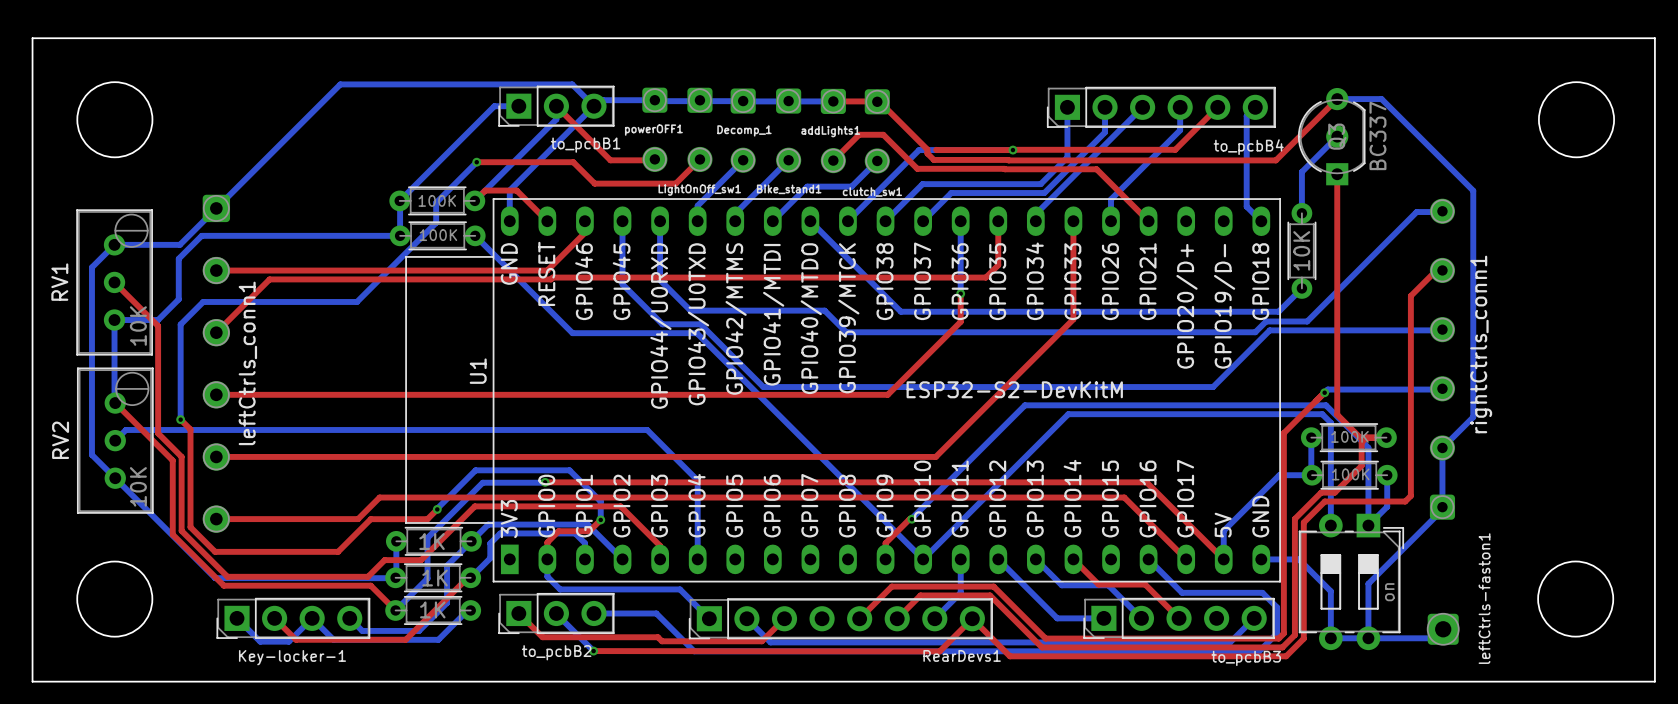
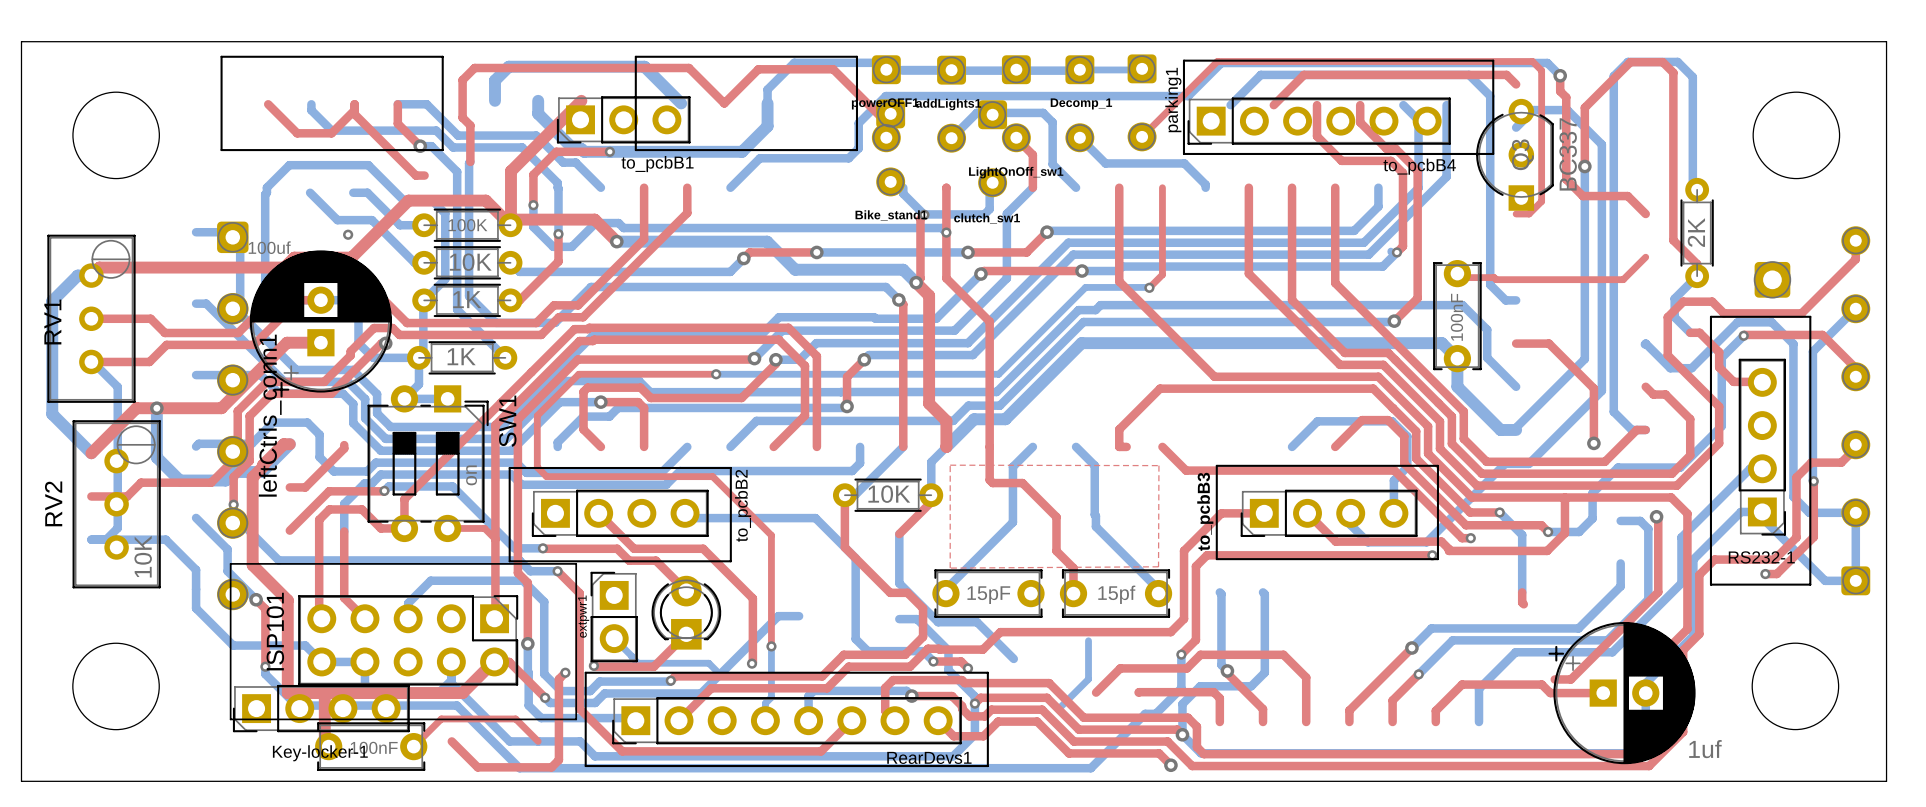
line: none -> (221, 56) (442, 56) (442, 150) (221, 150) (221, 56)
line: none -> (635, 56) (856, 56) (856, 150) (635, 150) (635, 56)
line: none -> (1183, 60) (1493, 60) (1493, 153) (1183, 153) (1183, 60)
bottom track: none -> (1142, 68) (1080, 69)
bottom track: none -> (1079, 69) (886, 70) (879, 62) (794, 62) (767, 89) (767, 126) (742, 151) (584, 151) (581, 148) (573, 148) (538, 113) (538, 100)
top track: none -> (1560, 75) (1560, 91) (1566, 97) (1566, 179) (1582, 196) (1627, 196) (1645, 214)
bottom track: none -> (1560, 75) (1547, 63) (1221, 63) (1188, 96) (885, 96) (858, 123) (858, 148) (848, 158) (759, 158) (730, 187)
via: none -> (1560, 75)
top track: none -> (1516, 84) (1506, 74) (1304, 74) (1273, 105)
bottom track: none -> (494, 100) (494, 80) (508, 66) (644, 66) (681, 103)
top track: none -> (581, 100) (510, 171) (510, 224)
parking1: none -> (1142, 102)
top track: none -> (268, 104) (297, 133) (331, 133) (354, 110)
bottom track: none -> (311, 104) (311, 110) (331, 130) (436, 130) (453, 147) (522, 147) (557, 182) (558, 234)
top track: none -> (354, 104) (354, 114) (415, 175) (424, 175)
top track: none -> (397, 104) (397, 123) (420, 146)
bottom track: none -> (397, 104) (426, 104) (458, 135) (536, 135) (563, 162) (575, 162) (600, 187)
bottom track: none -> (1230, 105) (1260, 74) (1469, 74) (1490, 96) (1490, 284) (1505, 300) (1516, 300)
top track: none -> (1317, 105) (1317, 136) (1341, 160) (1390, 160) (1402, 172) (1402, 246) (1396, 252)
top track: none -> (1360, 105) (1360, 122) (1386, 148) (1395, 148) (1417, 170) (1417, 298) (1394, 321)
bottom track: none -> (1403, 105) (1418, 120) (1418, 188) (1363, 242) (1068, 242) (967, 343) (816, 343) (799, 359) (775, 359)
bottom track: none -> (1446, 105) (1446, 176) (1368, 254) (1073, 254) (972, 355) (869, 355) (864, 359)
top track: (1337, 99) (1275, 160) (933, 159) (927, 153) (927, 149) (879, 101) (833, 101) -> none
bottom track: (1337, 99) (1381, 99) (1473, 190) (1473, 417) (1442, 447) (1442, 509) (1368, 583) (1368, 638) -> none
bottom track: (654, 100) (603, 100) (596, 106) (593, 106) -> none
bottom track: (655, 101) (743, 101) -> none
bottom track: (743, 101) (833, 101) -> none
bottom track: (518, 106) (494, 106) (399, 200) (400, 235) (201, 235) (178, 258) (178, 299) (158, 320) (114, 320) (115, 403) -> none
top track: (556, 106) (610, 160) (654, 159) -> none
bottom track: (556, 106) (556, 119) (474, 200) -> none
bottom track: (593, 106) (509, 190) (509, 221) -> none
bottom track: (593, 106) (572, 84) (340, 84) (179, 244) (114, 244) (91, 267) (91, 454) (215, 578) (395, 578) (396, 541) -> none
bottom track: (1067, 107) (1067, 157) (1040, 184) (922, 184) (885, 221) -> none
bottom track: (1105, 107) (1105, 132) (1044, 193) (951, 193) (923, 221) -> none
bottom track: (1142, 107) (1035, 214) (1035, 221) -> none
bottom track: (1180, 107) (1180, 130) (1110, 199) (1110, 221) -> none
top track: (1217, 107) (1175, 149) (936, 149) -> none
bottom track: (1255, 107) (1246, 115) (1246, 206) (1261, 221) -> none
bottom track: none -> (1516, 127) (1533, 110) (1567, 110) (1601, 144) (1601, 390) (1528, 463) (1505, 463) (1426, 542) (1367, 542) (1350, 525) (1350, 513)
top track: none -> (886, 137) (886, 122) (833, 69) (758, 69) (724, 103) (688, 68) (474, 68) (462, 80) (462, 117) (470, 125) (470, 161)
top track: none -> (1016, 137) (1032, 154) (1032, 187)
bottom track: none -> (1079, 137) (1105, 163) (1184, 163) (1205, 184) (1205, 187)
top track: none -> (1142, 136) (1217, 61) (1532, 61) (1541, 70) (1541, 201) (1529, 214) (1516, 214)
bottom track: none -> (951, 138) (976, 112) (1043, 112) (1052, 122) (1052, 164) (1076, 187)
bottom track: none -> (420, 146) (431, 146) (457, 171) (457, 309) (505, 357)
via: none -> (420, 146)
powerOFF1 position: (654, 129) -> (886, 103)
LightOnOff_sw1 position: (699, 129) -> (1016, 103)
Decomp_1 position: (743, 130) -> (1079, 103)
addLights1 position: (833, 131) -> (951, 104)
top track: none -> (609, 151) (556, 151) (533, 174) (533, 205)
via: none -> (609, 151)
bottom track: (1337, 136) (1301, 171) (1301, 213) -> none
bottom track: none -> (470, 161) (469, 296) (495, 322) (555, 322) (591, 287) (885, 287) (898, 299)
top track: none -> (1584, 166) (1584, 107) (1630, 62) (1662, 62) (1673, 72) (1673, 240) (1697, 264) (1697, 276)
bottom track: none -> (1584, 166) (1584, 359) (1516, 427) (1516, 429) (1500, 429) (1457, 386) (1457, 358) (1441, 343) (1081, 343) (1005, 419) (974, 419) (931, 462) (931, 495)
via: none -> (1584, 166)
bottom track: (1012, 150) (919, 150) (847, 221) -> none
via: (1012, 150) -> none
top track: (699, 159) (675, 183) (594, 183) (573, 162) (476, 162) -> none
bottom track: (743, 160) (697, 205) (697, 221) -> none
bottom track: (788, 160) (735, 213) (735, 221) -> none
top track: (833, 160) (859, 134) (883, 134) (917, 168) (1096, 169) (1148, 221) -> none
bottom track: (877, 160) (851, 186) (807, 186) (772, 221) -> none
bottom track: (476, 162) (436, 202) (436, 222) (356, 301) (203, 301) (180, 324) (180, 419) -> none
via position: (476, 162) -> (533, 205)
top track: none -> (644, 187) (644, 239) (578, 305) (554, 305) (536, 323) (407, 323) (355, 271) (299, 271) (238, 332) (164, 332) (150, 318) (91, 318)
top track: none -> (687, 187) (687, 213) (583, 317) (558, 317) (541, 334) (399, 334) (392, 328) (374, 328) (324, 381) (267, 381) (237, 411) (237, 456) (211, 482) (141, 482) (127, 496) (91, 496)
bottom track: none -> (903, 187) (903, 193) (924, 214) (984, 214) (989, 209) (989, 187)
top track: none -> (946, 187) (946, 278) (989, 321) (989, 480) (992, 483) (1022, 483) (1056, 517) (1056, 551) (1073, 568) (1073, 593)
bottom track: none -> (1032, 187) (1006, 213) (1006, 278) (954, 330) (782, 330) (754, 358)
top track: none -> (1119, 187) (1119, 281) (1214, 376) (1378, 376) (1428, 426) (1428, 453) (1471, 497) (1671, 497) (1687, 513) (1687, 629) (1671, 645) (1671, 727) (1644, 754) (1204, 754) (1196, 747) (1196, 726) (1187, 717) (1083, 717) (1049, 683) (964, 683) (961, 680) (893, 680) (885, 687) (885, 710) (894, 720)
top track: none -> (1162, 187) (1162, 274) (1149, 287)
top track: none -> (1248, 187) (1248, 273) (1339, 364) (1383, 364) (1439, 421) (1439, 448) (1476, 485) (1676, 485) (1719, 443) (1719, 406) (1667, 355) (1667, 317) (1683, 301) (1712, 301) (1723, 313) (1801, 313) (1855, 259) (1855, 240)
top track: none -> (1292, 187) (1292, 300) (1344, 352) (1388, 352) (1451, 416) (1451, 443) (1481, 473) (1672, 473) (1690, 455) (1690, 419) (1665, 394) (1653, 394) (1645, 386)
top track: none -> (1335, 187) (1335, 283) (1463, 411) (1463, 438) (1486, 461) (1604, 461) (1636, 429) (1645, 429)
bottom track: none -> (1378, 187) (1378, 206) (1354, 230) (1047, 232)
bottom track: none -> (1697, 189) (1692, 185) (1692, 77) (1677, 61) (1628, 61) (1613, 76) (1613, 411) (1631, 429) (1645, 429)
bottom track: none -> (310, 192) (337, 220) (371, 220) (414, 262) (424, 262)
bottom track: none -> (353, 192) (367, 192) (399, 225) (424, 225)
top track: (1337, 174) (1337, 414) (1360, 437) (1386, 437) -> none
bottom track: none -> (533, 205) (533, 227) (553, 246) (571, 246) (595, 223) (618, 223) (623, 228) (941, 228) (946, 232)
top track: none -> (924, 214) (920, 218) (920, 278) (916, 282) (929, 295) (929, 403) (946, 420) (946, 446)
via: none -> (924, 214)
part position: (437, 200) -> (467, 225)
top track: (474, 200) (485, 190) (516, 190) (547, 221) -> none
bottom track: none -> (196, 232) (226, 232) (240, 246) (240, 313) (296, 369) (352, 369) (377, 394) (377, 413) (390, 426) (501, 426) (593, 335) (761, 335) (778, 317) (936, 318) (980, 274)
top track: none -> (1047, 232) (1026, 252) (967, 252)
via: none -> (1047, 232)
via: none -> (946, 232)
part: none -> 2K (1697, 233)
top track: none -> (558, 234) (558, 261) (519, 300) (510, 300)
via: none -> (558, 234)
via: none -> (348, 234)
bottom track: (1442, 211) (1416, 212) (1307, 321) (1266, 321) (1255, 332) (846, 332) (824, 310) (690, 310) (660, 280) (660, 221) -> none
top track: none -> (616, 241) (594, 219) (516, 219) (510, 225) (485, 200) (408, 200) (351, 257) (294, 257) (284, 267) (99, 267) (91, 275)
bottom track: none -> (616, 241) (767, 241) (795, 269) (903, 269) (916, 282)
via: none -> (616, 241)
top track: (584, 221) (584, 232) (547, 270) (216, 270) -> none
bottom track: (622, 221) (622, 284) (662, 324) (700, 324) (763, 387) (1213, 387) (1269, 330) (1442, 329) -> none
top track: none -> (816, 252) (749, 252) (743, 258)
bottom track: none -> (816, 252) (967, 252)
via: none -> (816, 252)
bottom track: (810, 221) (900, 311) (1278, 311) (1301, 288) -> none
via: none -> (967, 252)
bottom track: (960, 221) (960, 293) -> none
top track: (998, 221) (998, 265) (985, 277) (269, 279) (216, 332) -> none
top track: (1073, 221) (1073, 319) (935, 456) (216, 456) -> none
bottom track: none -> (1396, 252) (1382, 266) (1122, 266) (1117, 271) (1082, 271)
via: none -> (1396, 252)
top track: none -> (1645, 257) (1623, 279) (1496, 279) (1494, 277) (1461, 277) (1457, 273)
bottom track: none -> (743, 258) (730, 271) (519, 271) (510, 262)
via: none -> (743, 258)
part: none -> 10K (467, 262)
part: 100K (437, 235) -> none
bottom track: (475, 235) (572, 333) (696, 333) (923, 559) (1068, 414) (1322, 414) (1330, 422) (1330, 525) -> none
top track: none -> (1082, 271) (983, 271) (980, 274)
via: none -> (1082, 271)
via: none -> (980, 274)
bottom track: none -> (91, 275) (77, 275) (52, 301) (52, 414) (91, 453)
bottom track: none -> (1697, 276) (1674, 298) (1674, 317) (1690, 332)
part: none -> (1772, 279)
via: none -> (916, 282)
part: 10K (1301, 250) -> none
bottom track: none -> (1149, 287) (1085, 287) (998, 374) (716, 374)
via: none -> (1149, 287)
top track: none -> (898, 299) (903, 304) (903, 446)
via: none -> (898, 299)
top track: none -> (320, 300) (298, 300) (253, 344) (166, 344) (149, 361) (91, 361)
part: none -> 1K (467, 300)
bottom track: none -> (196, 303) (206, 303) (284, 381) (347, 381) (365, 399) (365, 418) (385, 438) (506, 438) (564, 381) (639, 381) (650, 392) (840, 392)
top track: (1442, 270) (1435, 271) (1410, 295) (1410, 495) (1405, 501) (1324, 501) (1303, 522) (1303, 638) (1286, 656) (1009, 656) (972, 618) (939, 651) (593, 651) -> none
bottom track: none -> (1855, 308) (1812, 351) (1813, 481)
part: none -> 100nF (1457, 316)
line: none -> (1710, 316) (1810, 316) (1810, 584) (1710, 584) (1710, 316)
bottom track: none -> (1394, 321) (1083, 322) (999, 405) (968, 405) (953, 420) (756, 420) (730, 446)
via: none -> (1394, 321)
top track: (114, 282) (158, 326) (158, 433) (181, 456) (181, 530) (227, 576) (368, 576) (384, 560) (421, 560) (474, 506) (620, 506) (660, 545) (660, 559) -> none
RV1 position: (114, 282) -> (91, 318)
part: none -> 100uf (320, 323)
top track: none -> (1690, 332) (1699, 332) (1719, 352) (1719, 367) (1733, 381) (1762, 382)
top track: (960, 293) (960, 321) (887, 394) (216, 394) -> none
via: (960, 293) -> none
top track: none -> (1743, 335) (1822, 334) (1855, 368) (1855, 376)
bottom track: none -> (1743, 335) (1721, 357) (1721, 426) (1680, 467) (1618, 467) (1592, 493) (1592, 518) (1579, 531) (1548, 531)
via: none -> (1743, 335)
top track: none -> (320, 342) (286, 342) (221, 408) (136, 408) (91, 453)
top track: none -> (385, 343) (381, 343) (331, 393) (272, 393) (249, 416) (249, 461) (233, 477) (233, 504)
via: none -> (385, 343)
top track: none -> (1516, 343) (1548, 343) (1593, 388) (1593, 443)
bottom track: none -> (1644, 344) (1670, 368) (1691, 368) (1737, 322) (1771, 322) (1793, 344) (1793, 496) (1809, 512) (1855, 512) (1855, 580) (1825, 580) (1762, 518) (1762, 511) (1740, 511) (1693, 559) (1693, 635) (1645, 683) (1645, 734) (1627, 753) (1200, 753) (1182, 734) (1182, 704) (1200, 686) (1251, 686) (1264, 672) (1264, 594) (1263, 592)
bottom track: none -> (418, 357) (423, 353) (423, 301) (445, 279) (445, 213) (431, 200) (403, 200) (368, 165) (289, 165) (266, 187) (265, 194) (265, 283) (281, 300) (348, 300) (358, 309) (358, 343) (373, 357) (418, 357)
bottom track: none -> (418, 357) (418, 384) (404, 398) (447, 398)
part: none -> 1K (462, 357)
top track: none -> (754, 358) (577, 359) (517, 419) (517, 572) (527, 582) (527, 643)
via: none -> (754, 358)
top track: none -> (775, 359) (775, 363) (741, 398) (650, 398) (640, 387) (587, 387) (583, 391) (583, 429) (600, 446)
via: none -> (775, 359)
top track: none -> (864, 359) (847, 377) (847, 406)
via: none -> (864, 359)
bottom track: none -> (91, 361) (117, 386) (117, 528) (106, 539)
RV1 value: 10K (138, 326) -> none
top track: none -> (716, 374) (578, 374) (537, 415) (537, 467) (546, 476) (712, 476) (771, 535) (771, 646)
via: none -> (716, 374)
bottom track: none -> (196, 375) (260, 375) (279, 393) (343, 393) (353, 404) (353, 423) (380, 450) (511, 450) (560, 402) (600, 402)
bottom track: none -> (1516, 386) (1487, 357) (1487, 329) (1462, 305) (1100, 305) (1095, 310) (1078, 310) (996, 392) (841, 392)
top track: none -> (600, 402) (638, 402) (644, 408) (644, 446)
via: none -> (600, 402)
bottom track: none -> (847, 406) (618, 407) (609, 416) (583, 416) (557, 442) (557, 446)
via: none -> (847, 406)
bottom track: none -> (156, 408) (156, 457) (179, 480) (225, 480) (234, 472) (262, 472) (289, 444)
via: none -> (156, 408)
top track: none -> (1392, 408) (1373, 388) (1160, 388) (1119, 429) (1119, 446) (1126, 446)
top track: none -> (1393, 408) (1416, 431) (1416, 458) (1470, 512) (1499, 512)
rightCtrls_conn1: (1442, 359) -> none
part: none -> (1855, 410)
via: none -> (1593, 443)
top track: none -> (289, 444) (283, 444) (252, 477) (252, 565) (287, 600) (287, 693) (462, 693) (493, 661) (509, 661) (545, 697)
bottom track: (1442, 388) (1327, 389) (1324, 392) -> none
top track: none -> (344, 445) (344, 448) (305, 487) (289, 487)
bottom track: none -> (196, 446) (198, 443) (251, 443) (272, 422) (307, 422) (319, 434) (319, 457) (333, 471) (367, 471) (375, 462) (516, 462) (526, 472) (661, 472) (687, 446)
top track: none -> (773, 446) (804, 415) (804, 365) (778, 339) (579, 341) (495, 425) (494, 618)
top track: none -> (816, 446) (816, 356) (788, 327) (574, 329) (404, 499) (404, 528) (380, 528) (361, 509) (329, 509) (319, 519) (319, 616) (321, 618)
bottom track: none -> (860, 446) (860, 463) (852, 471) (680, 471) (666, 484) (521, 484) (511, 474) (380, 474) (372, 483) (364, 483) (344, 503) (344, 531)
bottom track: none -> (903, 446) (854, 495) (844, 495)
U1: ESP32-S2-DevKitM (843, 390) -> none
bottom track: none -> (1032, 446) (1012, 466) (1012, 522) (945, 589) (945, 593)
bottom track: none -> (1076, 446) (1094, 465) (1095, 526) (1158, 589) (1158, 593)
top track: none -> (1162, 446) (1186, 470) (1394, 470) (1462, 538) (1470, 538)
bottom track: none -> (1292, 446) (1317, 421) (1392, 421) (1407, 436) (1407, 467) (1393, 480) (1393, 513)
top track: none -> (1335, 446) (1362, 420) (1388, 420) (1404, 436) (1404, 463) (1466, 525) (1541, 525) (1548, 531)
RS232-1: none -> (1762, 447)
via: (1324, 392) -> none
top track: none -> (1854, 449) (1841, 462) (1811, 462) (1796, 477) (1796, 537) (1774, 559) (1714, 559) (1699, 574) (1699, 634) (1683, 650) (1683, 732) (1649, 766) (1192, 766) (1167, 741) (1073, 741) (1042, 709) (991, 709) (984, 716) (969, 716) (952, 696) (911, 696)
top track: (1316, 400) (1316, 400) (1324, 392) (1324, 392) (1283, 433) (1283, 633) (1278, 638) (1045, 638) (993, 586) (891, 586) (859, 618) -> none
top track: (115, 403) (172, 460) (172, 534) (223, 585) (370, 585) (395, 610) -> none
SW1: none -> (428, 463)
top zone outline: none -> (950, 465) (1158, 465) (1158, 566) (950, 568) (950, 465)
line: none -> (1216, 465) (1437, 465) (1437, 559) (1216, 559) (1216, 465)
line: none -> (509, 467) (730, 467) (730, 561) (509, 561) (509, 467)
bottom track: none -> (1762, 468) (1750, 468) (1681, 537) (1681, 583) (1612, 652) (1515, 652) (1479, 688) (1479, 721)
top track: (180, 419) (190, 429) (190, 527) (215, 551) (338, 551) (370, 519) (427, 519) (437, 509) -> none
via position: (180, 419) -> (233, 504)
top track: none -> (1813, 481) (1813, 537) (1776, 574) (1765, 574)
via: none -> (1813, 481)
top track: none -> (384, 490) (329, 491) (289, 530)
bottom track: none -> (384, 490) (388, 486) (452, 486) (514, 548) (542, 548)
via: none -> (384, 490)
top track: none -> (844, 495) (844, 547) (890, 592) (907, 592) (923, 608) (923, 636) (905, 654) (843, 654) (822, 676) (675, 676) (670, 680)
part: none -> 10K (888, 495)
top track: none -> (931, 495) (931, 502) (899, 534)
top track: none -> (1564, 497) (1564, 533) (1547, 550) (1448, 550) (1441, 541) (1335, 541) (1307, 513)
bottom track: (1311, 437) (1312, 475) (1279, 475) (1223, 530) (1223, 559) (1221, 562) -> none
part: 100K (1348, 437) -> none
top track: (1366, 437) (1361, 442) (1361, 465) (1334, 492) (1321, 492) (1294, 518) (1294, 634) (1282, 647) (1042, 647) (990, 595) (920, 595) (897, 618) -> none
bottom track: (115, 440) (125, 429) (647, 429) (697, 480) (697, 559) -> none
bottom track: none -> (233, 504) (233, 515) (278, 560) (519, 560) (530, 571) (557, 571)
bottom track: none -> (1499, 512) (1522, 534) (1522, 592)
via: none -> (1499, 512)
top track: none -> (598, 513) (634, 548) (703, 548) (752, 598) (752, 663)
bottom track: none -> (685, 513) (689, 518) (815, 518) (855, 558) (855, 639) (867, 651) (923, 651) (933, 661)
top track: none -> (1264, 513) (1221, 513) (1184, 550) (1184, 618) (1170, 632) (1000, 632) (982, 649) (928, 648) (910, 666) (848, 666) (827, 688) (711, 688) (679, 720)
top track: none -> (1656, 516) (1658, 518) (1658, 592) (1570, 679) (1554, 679)
via: none -> (1656, 516)
bottom track: none -> (196, 517) (227, 549) (227, 571) (256, 599)
bottom track: none -> (1620, 520) (1640, 520) (1648, 528) (1648, 599) (1607, 640) (1452, 640) (1418, 674)
top track: none -> (447, 528) (484, 528) (495, 539)
top track: none -> (344, 531) (344, 598) (364, 618)
via: none -> (1548, 531)
bottom track: none -> (899, 534) (899, 583) (938, 622) (977, 622) (1013, 658)
via: none -> (1470, 538)
bottom track: none -> (91, 539) (165, 539) (196, 569) (196, 608) (233, 645) (305, 645) (321, 661) (364, 661) (364, 684) (372, 691) (440, 691) (451, 680)
part: 100K (1349, 475) -> none
bottom track: (1387, 475) (1387, 506) (1368, 525) (1368, 447) (1325, 405) (1024, 405) (911, 518) -> none
top track: none -> (542, 548) (617, 548) (629, 560) (655, 560) (686, 591)
via: none -> (542, 548)
top track: (545, 482) (1146, 482) (1223, 559) -> none
bottom track: (545, 482) (482, 482) (427, 537) (427, 578) (395, 610) -> none
via: (545, 482) -> none
top track: none -> (1432, 555) (1207, 555) (1195, 566) (1195, 640) (1181, 654)
via: none -> (1432, 555)
line: none -> (230, 563) (576, 563) (576, 719) (230, 719) (230, 563)
bottom track: none -> (1620, 563) (1620, 586) (1578, 628) (1431, 628) (1411, 648)
top track: none -> (557, 571) (579, 593) (579, 708) (622, 751) (821, 751) (851, 720)
via: none -> (557, 571)
via: none -> (1765, 574)
bottom track: (437, 509) (475, 470) (569, 470) (600, 501) (600, 519) -> none
via: (437, 509) -> none
bottom track: none -> (1219, 592) (1221, 594) (1221, 665) (1227, 670)
top track: none -> (1522, 592) (1523, 604)
part: none -> 15pF (988, 593)
part: none -> 15pf (1116, 593)
top track: (216, 519) (358, 519) (379, 497) (1124, 497) (1186, 559) -> none
top track: (600, 519) (589, 531) (558, 531) (547, 542) (547, 559) -> none
via: (600, 519) -> none
top track: (911, 519) (909, 519) (885, 543) (885, 559) -> none
via: (911, 519) -> none
top track: none -> (256, 599) (265, 609) (265, 666)
via: none -> (256, 599)
part: none -> (686, 612)
bottom track: none -> (799, 616) (778, 616) (701, 693) (604, 693) (595, 702) (550, 702) (545, 697)
extpwr1: none -> (614, 617)
bottom track: none -> (408, 618) (408, 603) (430, 580) (523, 580) (544, 601) (544, 674) (561, 691) (590, 691) (599, 681) (670, 680)
bottom track: none -> (899, 619) (917, 619) (948, 650) (948, 670) (974, 696) (974, 734) (953, 756) (594, 756) (580, 741) (509, 741) (451, 683) (451, 661) (448, 664)
part: 1K (433, 541) -> none
top track: none -> (686, 634) (653, 666) (593, 665)
bottom track: none -> (614, 638) (637, 663) (708, 663) (720, 674)
ISP101: none -> (408, 640)
bottom track: (547, 559) (547, 576) (560, 589) (680, 589) (709, 618) -> none
bottom track: (584, 559) (584, 543) (575, 533) (500, 533) (490, 543) (490, 558) (470, 577) -> none
bottom track: (622, 559) (587, 524) (488, 524) (447, 565) (447, 602) (419, 630) (362, 630) (349, 618) -> none
bottom track: (998, 559) (1057, 618) (1103, 618) -> none
bottom track: (1035, 559) (1061, 585) (1108, 585) (1141, 618) -> none
top track: (1073, 559) (1098, 584) (1145, 584) (1179, 618) -> none
bottom track: (1148, 559) (1182, 592) (1262, 592) (1277, 607) (1277, 633) (1259, 651) (694, 651) (656, 613) (593, 613) -> none
bottom track: (1261, 559) (1298, 559) (1330, 591) (1330, 638) (1434, 638) (1443, 629) -> none
bottom track: none -> (527, 643) (528, 705) (541, 718) (633, 718) (635, 720)
via: none -> (527, 643)
bottom track: none -> (771, 646) (771, 697) (765, 703) (765, 720)
via: none -> (771, 646)
top track: none -> (1411, 648) (1349, 710) (1349, 721)
via: none -> (1411, 648)
bottom track: none -> (1181, 654) (1181, 688) (1155, 713) (1145, 713) (1090, 768) (519, 768) (456, 705) (296, 705) (265, 674) (265, 666)
via: none -> (1181, 654)
part: 1K (433, 577) -> none
top track: (470, 577) (467, 577) (405, 639) (296, 639) (274, 618) -> none
top track: none -> (933, 661) (961, 661) (967, 668)
via: none -> (933, 661)
via: none -> (752, 663)
via: none -> (265, 666)
via: none -> (593, 665)
part: (1351, 581) -> none
via: none -> (967, 668)
top track: none -> (1227, 670) (1227, 673) (1263, 709) (1263, 721)
via: none -> (1227, 670)
top track: none -> (565, 672) (558, 679) (558, 760) (551, 767) (477, 767) (451, 741)
via: none -> (565, 672)
line: none -> (585, 672) (987, 672) (987, 766) (585, 766) (585, 672)
top track: none -> (1418, 674) (1392, 700) (1392, 721)
via: none -> (1418, 674)
to_pcbB2 footprint: [498, 592, 615, 635] -> [531, 489, 709, 537]
via: none -> (670, 680)
to_pcbB3 footprint: [1083, 597, 1275, 639] -> [1240, 489, 1418, 537]
top track: none -> (324, 693) (324, 742) (328, 746)
top track: none -> (1096, 692) (1120, 668) (1186, 668) (1200, 654) (1283, 654) (1306, 677) (1306, 721)
top track: none -> (1138, 692) (1213, 692) (1219, 698) (1219, 721)
top track: none -> (1603, 693) (1550, 693) (1541, 684) (1462, 684) (1435, 710) (1435, 721)
part: none -> 1uf (1622, 693)
bottom track: none -> (911, 696) (906, 690) (813, 690) (808, 696) (808, 720)
via: none -> (911, 696)
via: none -> (545, 697)
part: 1K (433, 610) -> none
bottom track: (470, 610) (467, 610) (438, 639) (333, 639) (312, 618) (288, 641) (260, 641) (237, 618) -> none
top track: (518, 613) (542, 637) (657, 637) (662, 641) (761, 641) (784, 618) -> none
bottom track: (556, 613) (593, 651) -> none
top track: none -> (974, 703) (980, 697) (1047, 697) (1078, 729) (1177, 729) (1182, 734)
via: none -> (974, 703)
RearDevs1 position: (840, 618) -> (787, 720)
bottom track: (1254, 618) (1230, 642) (770, 642) (746, 618) -> none
top track: none -> (938, 720) (953, 736) (983, 736) (998, 721) (1037, 721) (1069, 753) (1159, 753) (1170, 765)
leftCtrls-faston1: (1443, 629) -> none
via: none -> (1182, 734)
top track: none -> (538, 741) (515, 718) (441, 718) (413, 746)
part: none -> 100nF (371, 746)
via: (593, 651) -> none
to_pcbB2 name position: to_pcbB2 (556, 652) -> to_pcbB2 (743, 505)
RearDevs1 name position: RearDevs1 (962, 655) -> RearDevs1 (929, 757)
to_pcbB3 name position: to_pcbB3 (1246, 658) -> to_pcbB3 (1205, 511)
via: none -> (1170, 765)

